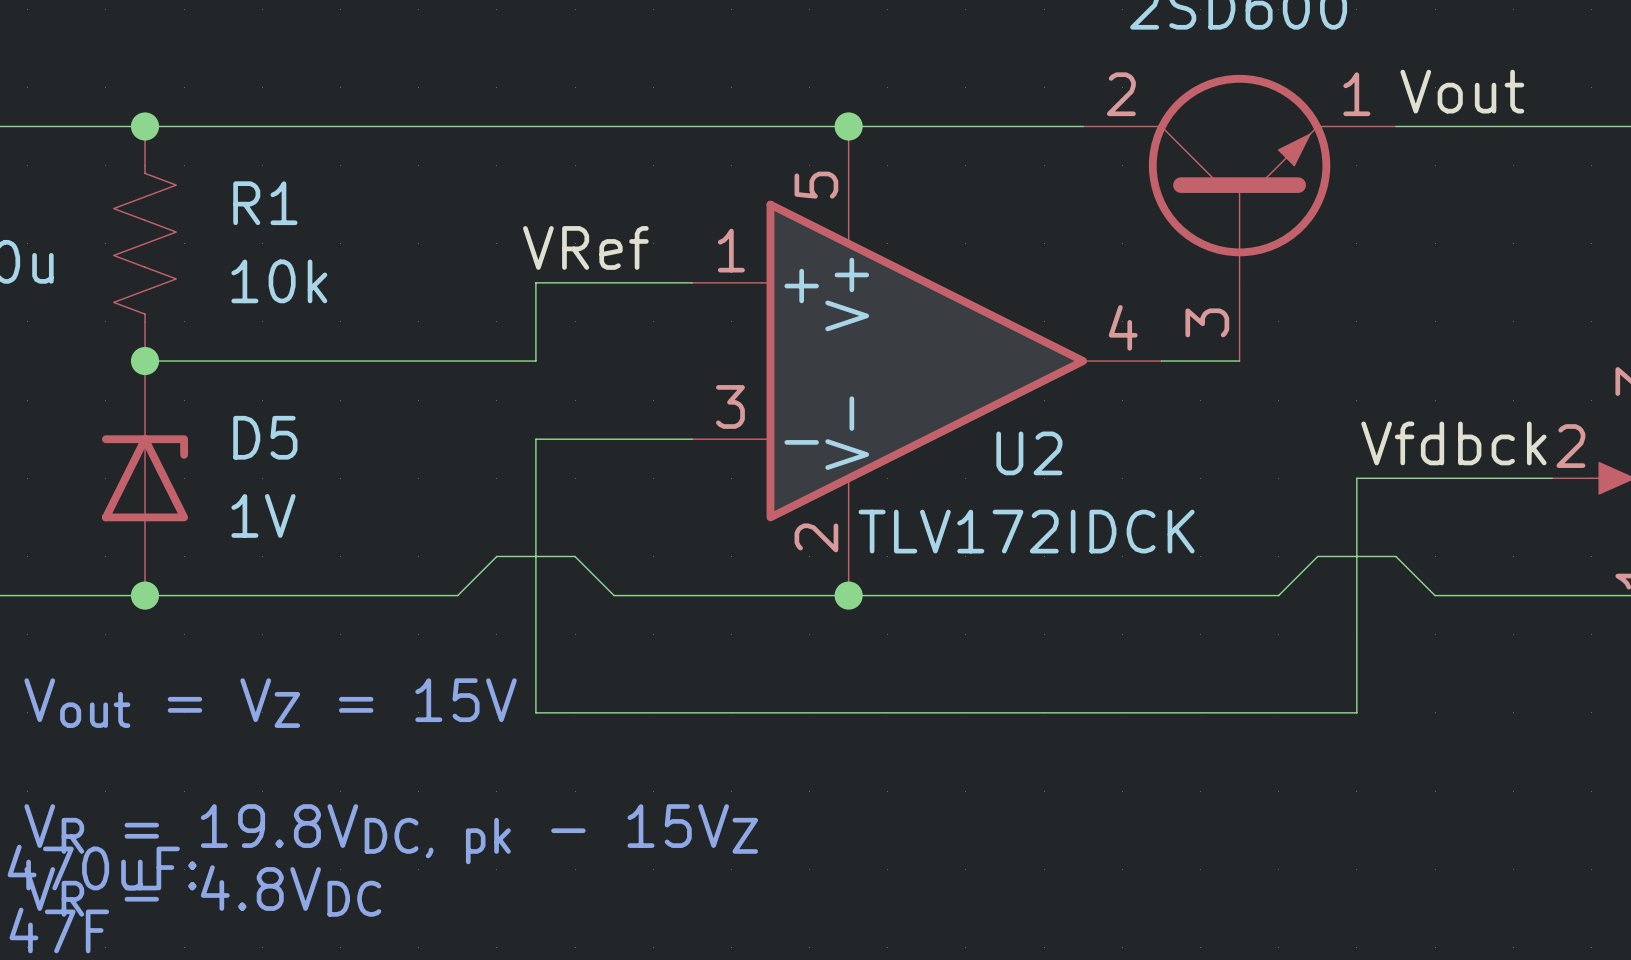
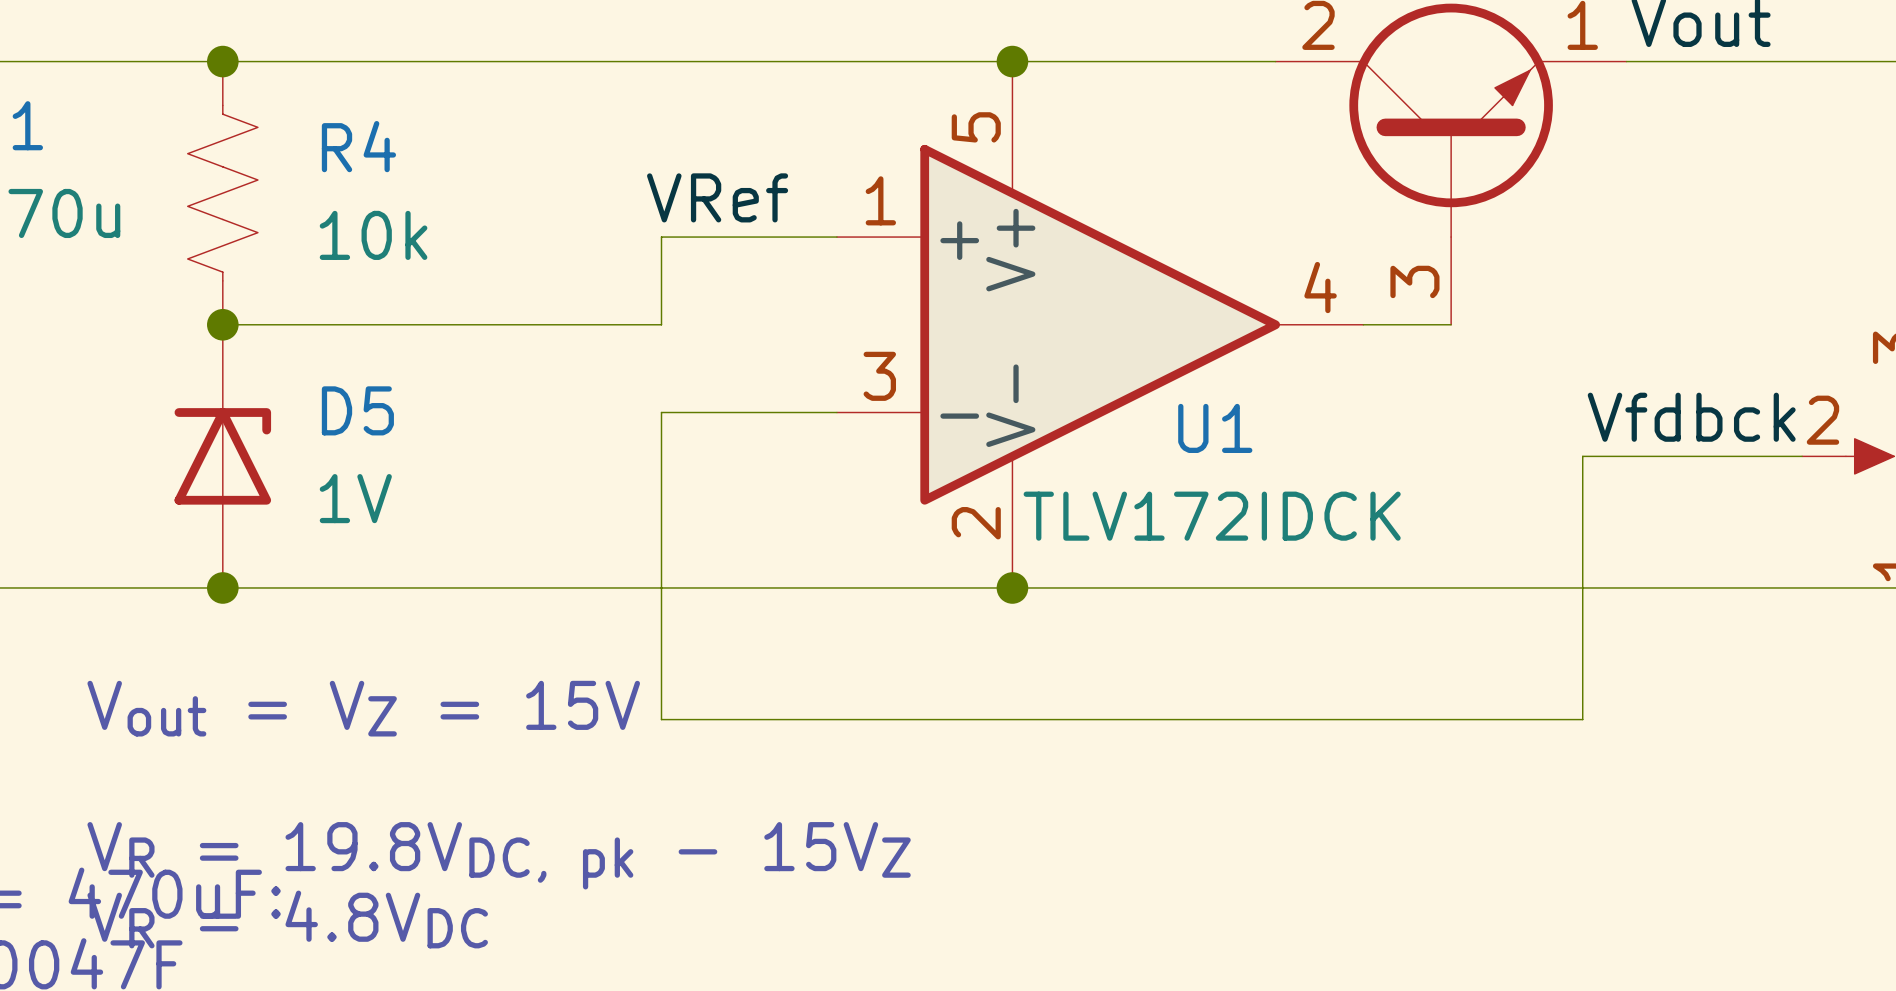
R1 name: R1 (265, 203) -> R4 (358, 146)
U2 name: U2 (1029, 453) -> U1 (1215, 428)
wire: (457, 595) (496, 556) (575, 556) (614, 595) -> (573, 587) (749, 587)
wire: (1278, 595) (1317, 556) (1395, 556) (1435, 595) -> (1494, 587) (1670, 587)

